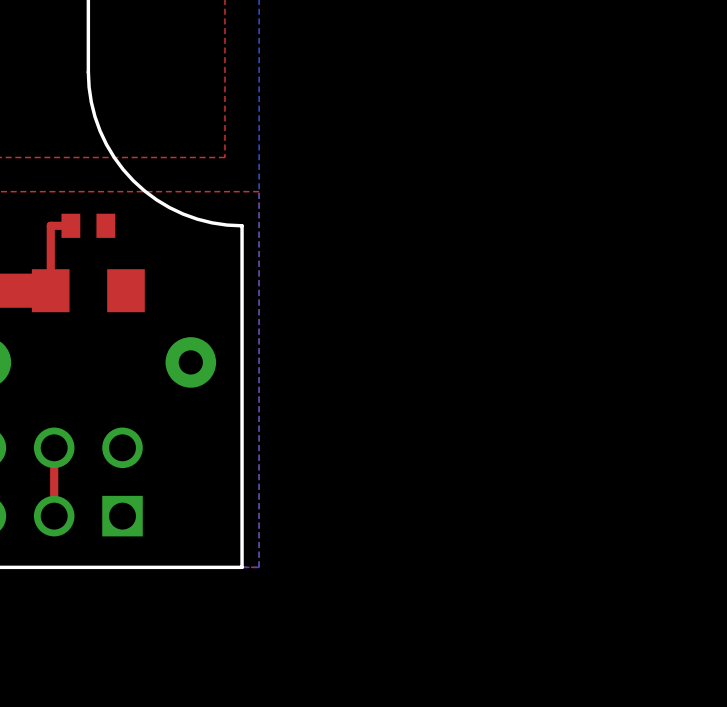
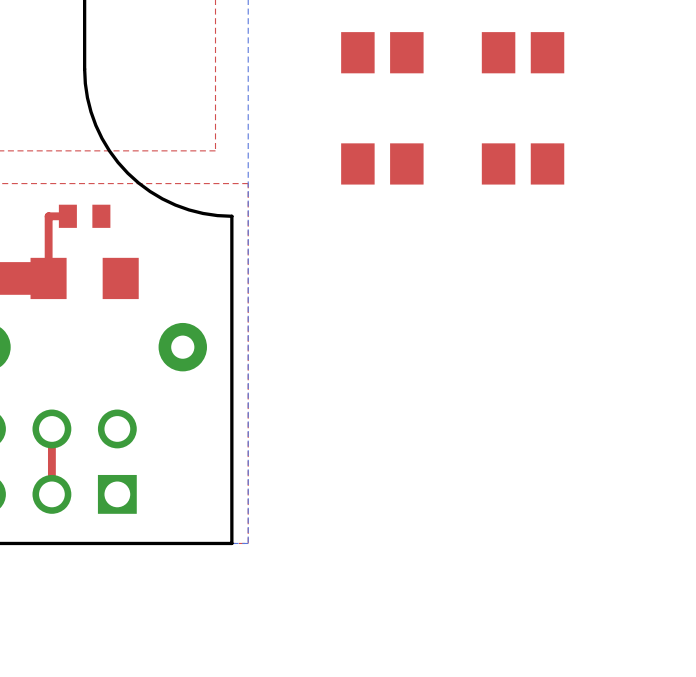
part: none -> (382, 52)
part: none -> (523, 52)
part: none -> (382, 163)
part: none -> (523, 163)

